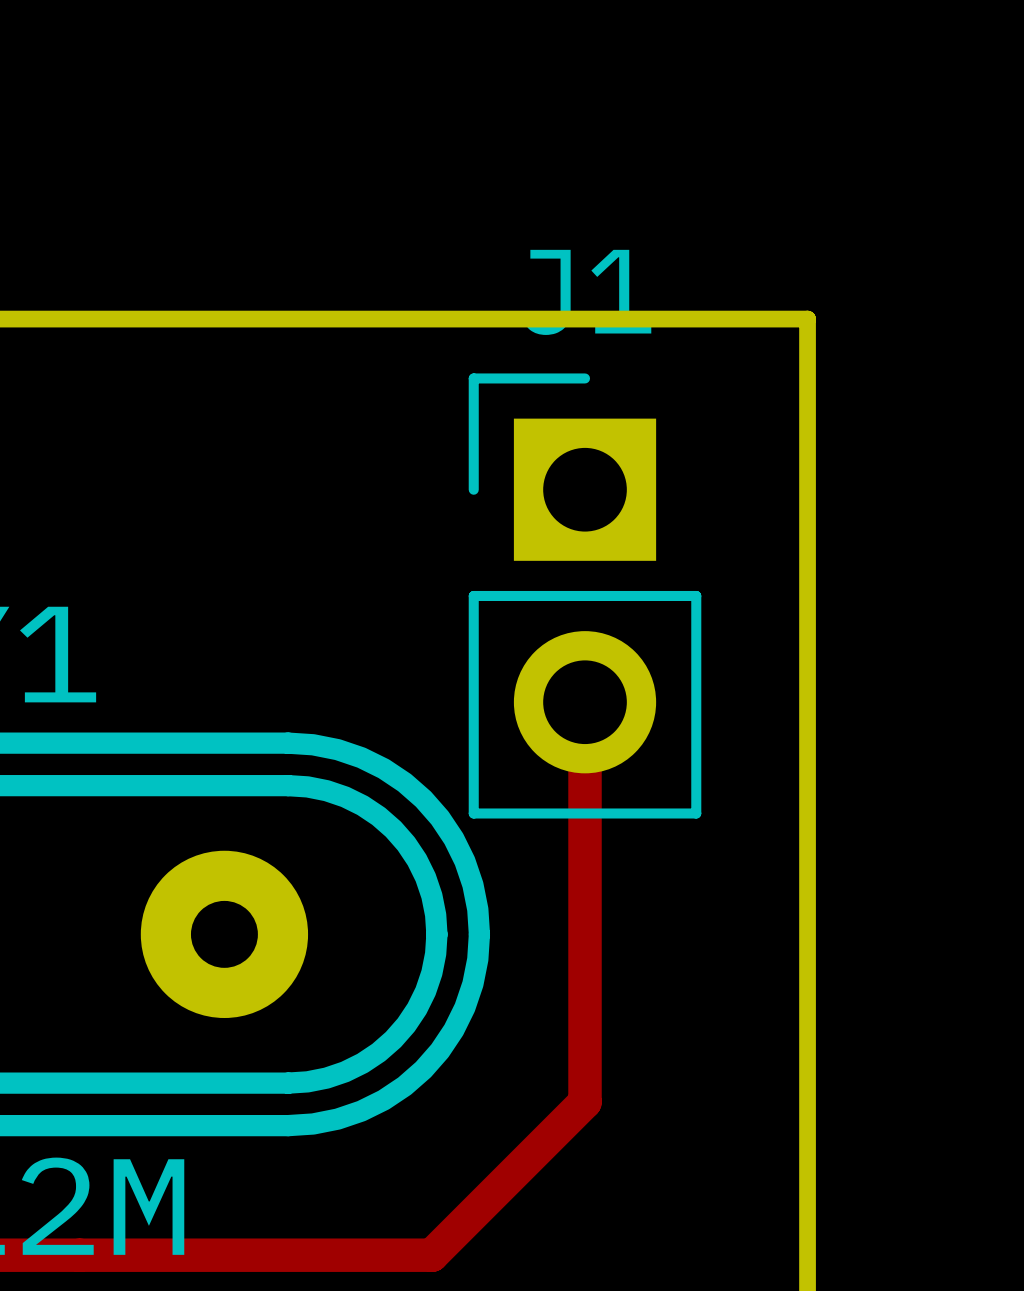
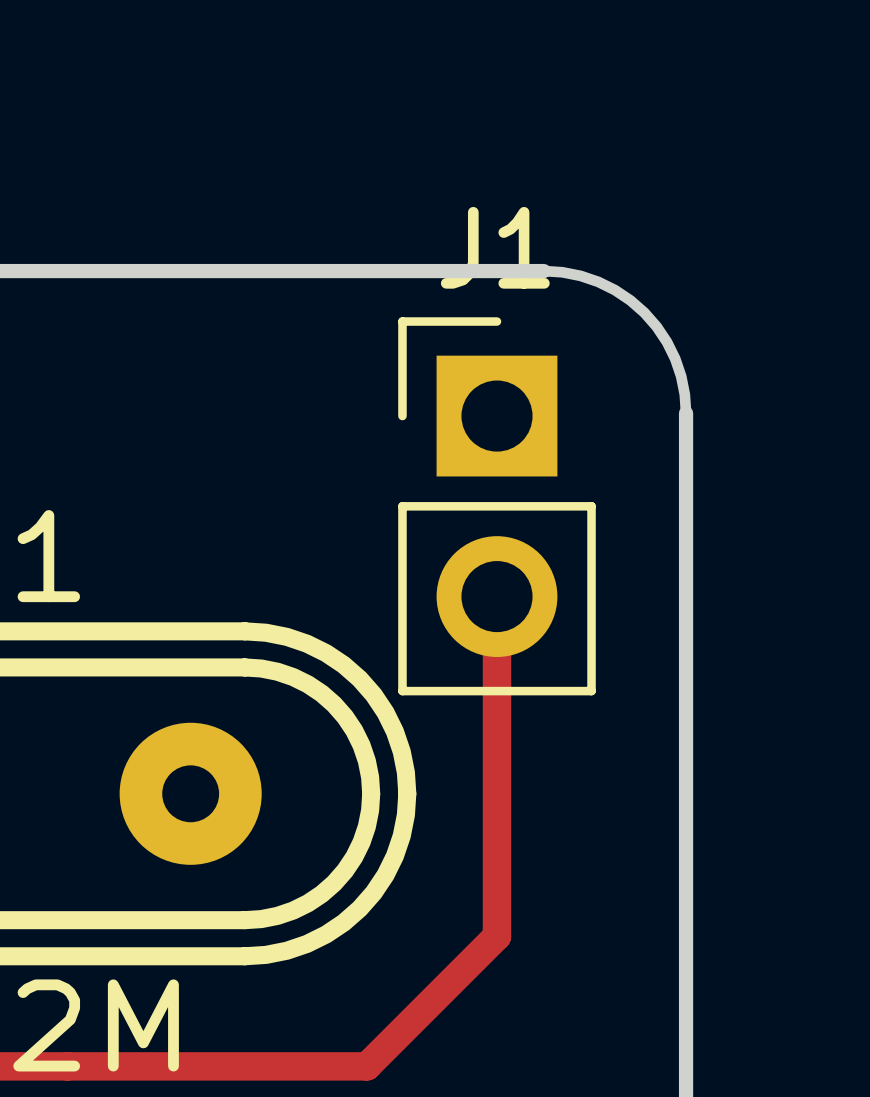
board edge: (640, 319) (807, 319) (807, 486) -> (543, 271) (580, 275) (598, 281) (614, 290) (644, 312) (667, 342) (675, 358) (681, 376) (686, 413)

